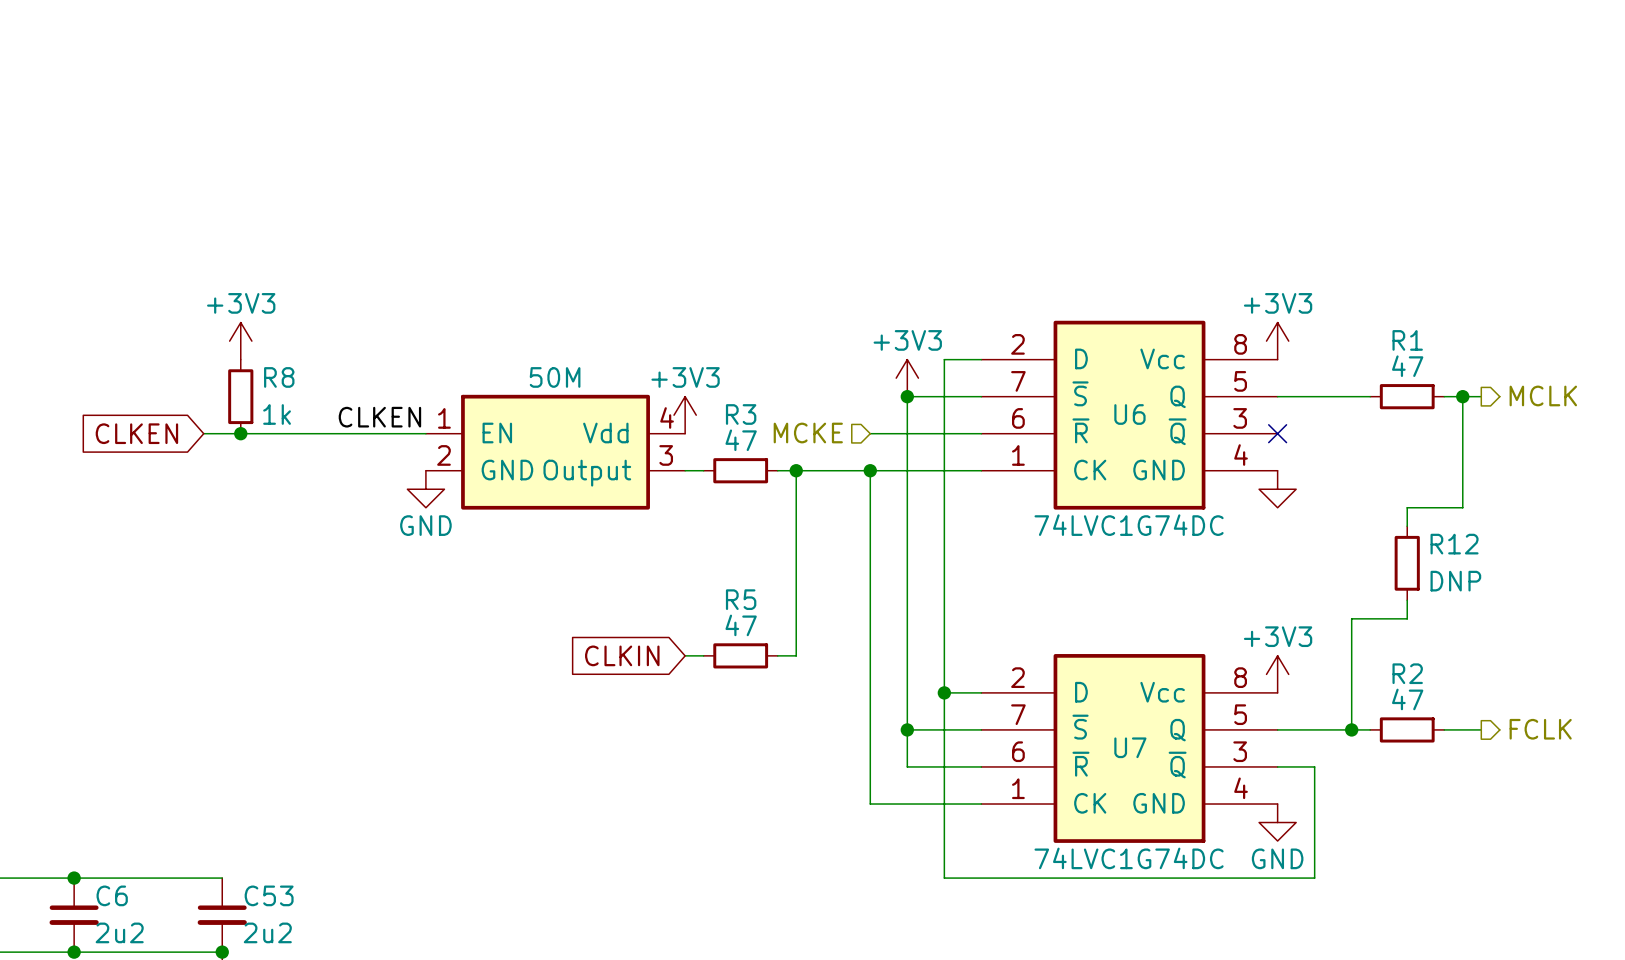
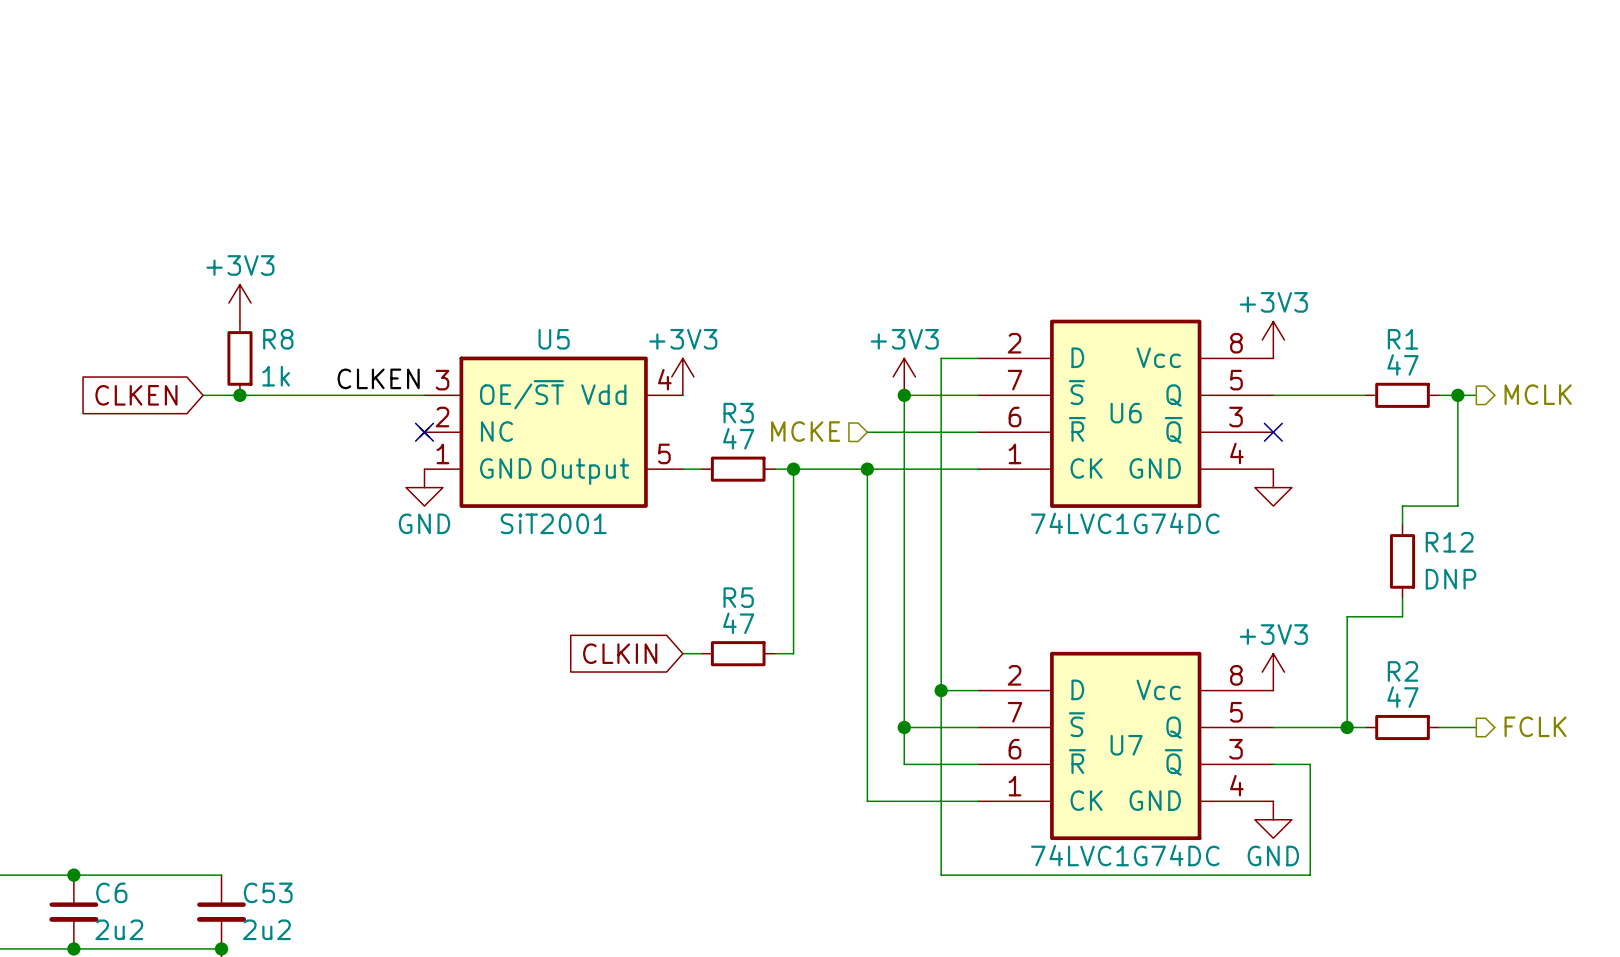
power symbol position: +3V3 (240, 341) -> +3V3 (239, 303)
R8 position: (240, 396) -> (239, 358)
power symbol position: +3V3 (685, 415) -> +3V3 (682, 376)
label position: CLKEN (379, 417) -> CLKEN (378, 378)
global label position: CLKEN (136, 433) -> CLKEN (136, 395)
wire: (203, 433) (425, 433) -> (203, 395) (424, 395)
junction position: (240, 433) -> (239, 395)
no-connect mark: none -> (424, 432)
U5: none -> SiT2001 (551, 432)
part: 50M (555, 452) -> none

